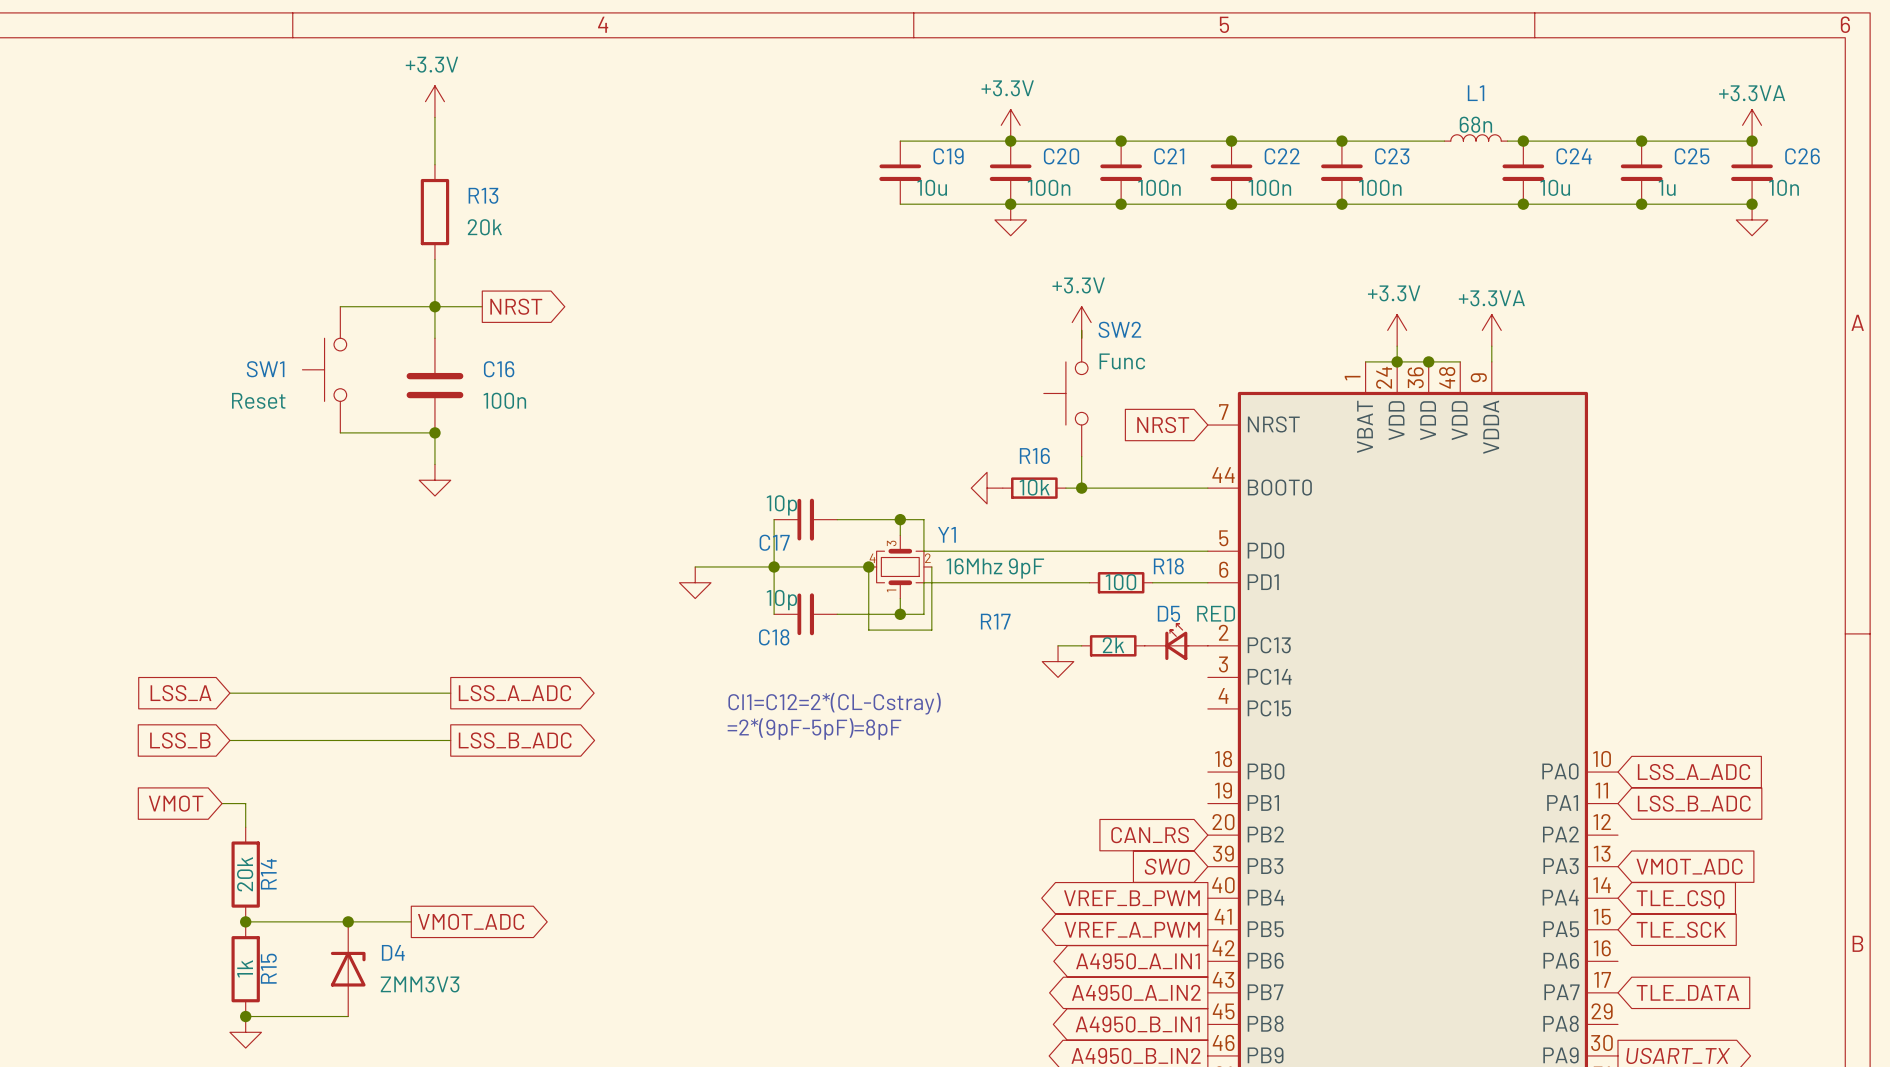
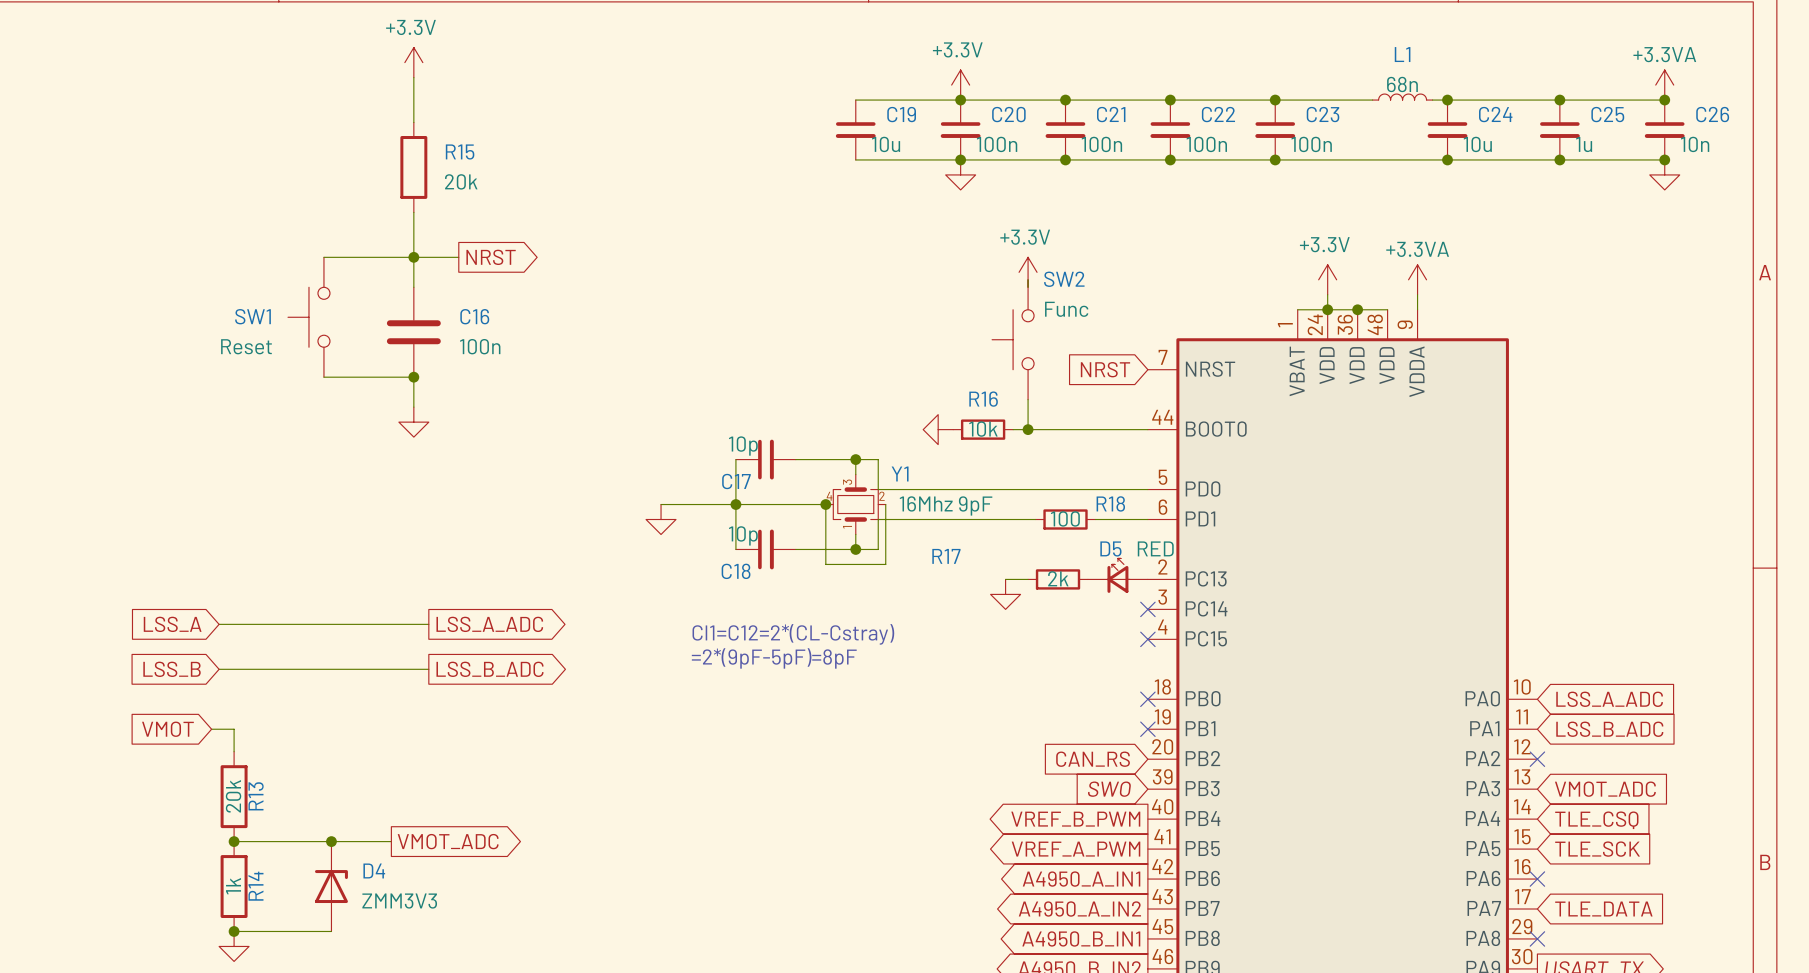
R13 name: R13 (483, 195) -> R15 (460, 151)
no-connect mark: none -> (1147, 609)
no-connect mark: none -> (1147, 639)
no-connect mark: none -> (1147, 699)
no-connect mark: none -> (1147, 729)
no-connect mark: none -> (1537, 759)
R14 name: R14 (268, 874) -> R13 (256, 796)
no-connect mark: none -> (1537, 879)
R15 name: R15 (268, 968) -> R14 (255, 886)
no-connect mark: none -> (1537, 938)

